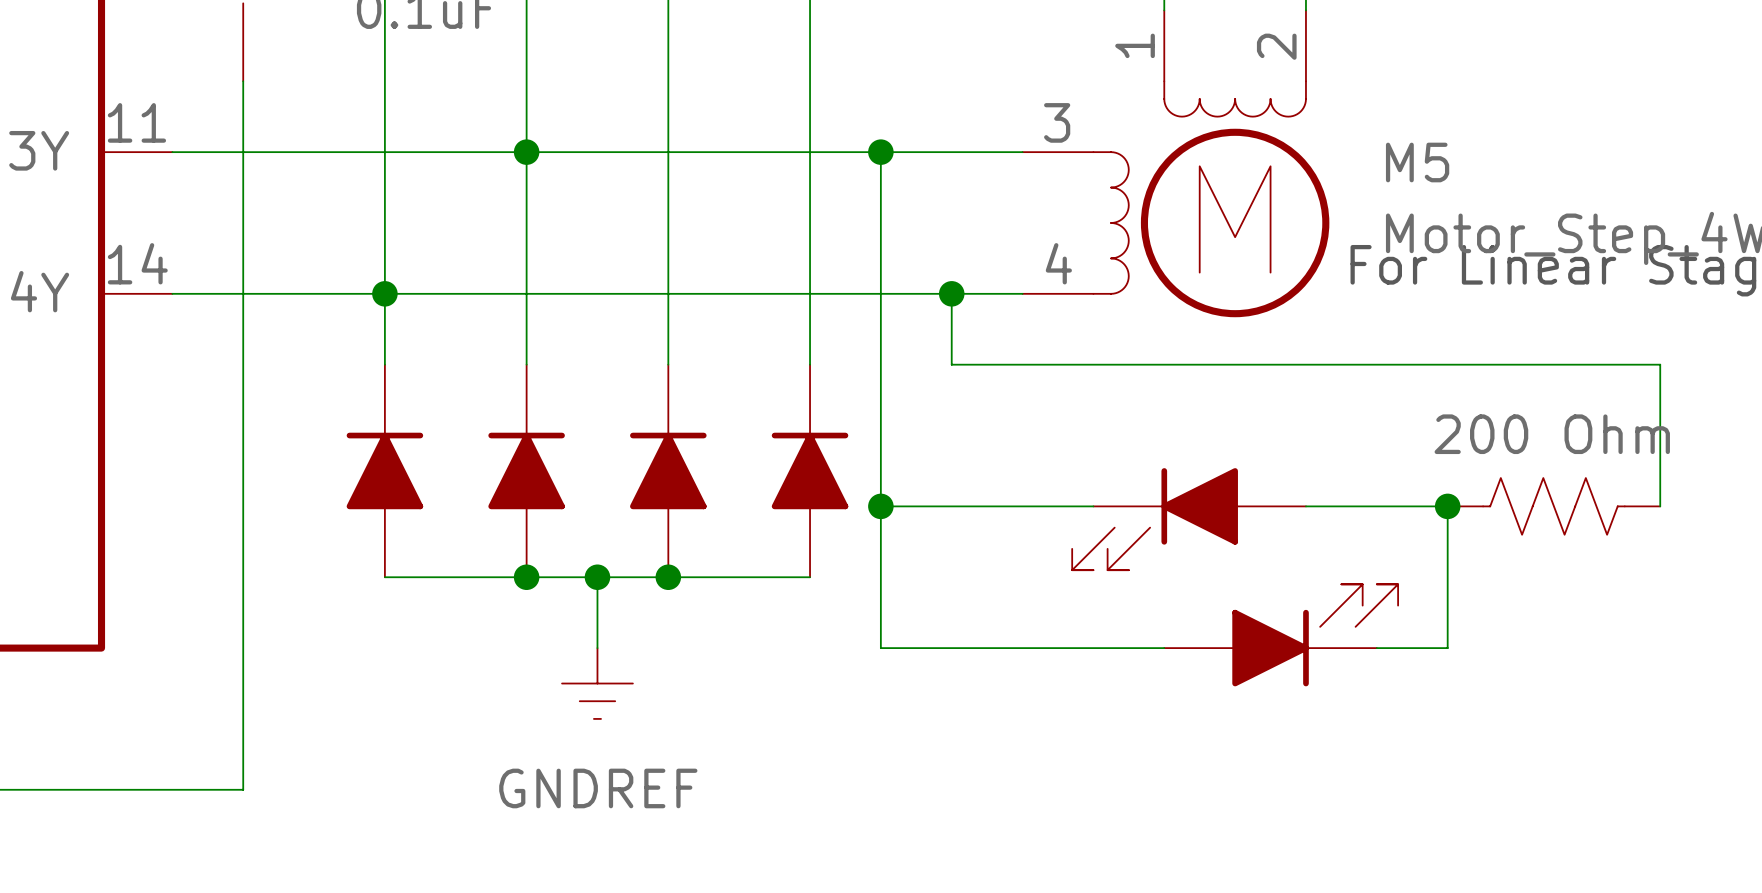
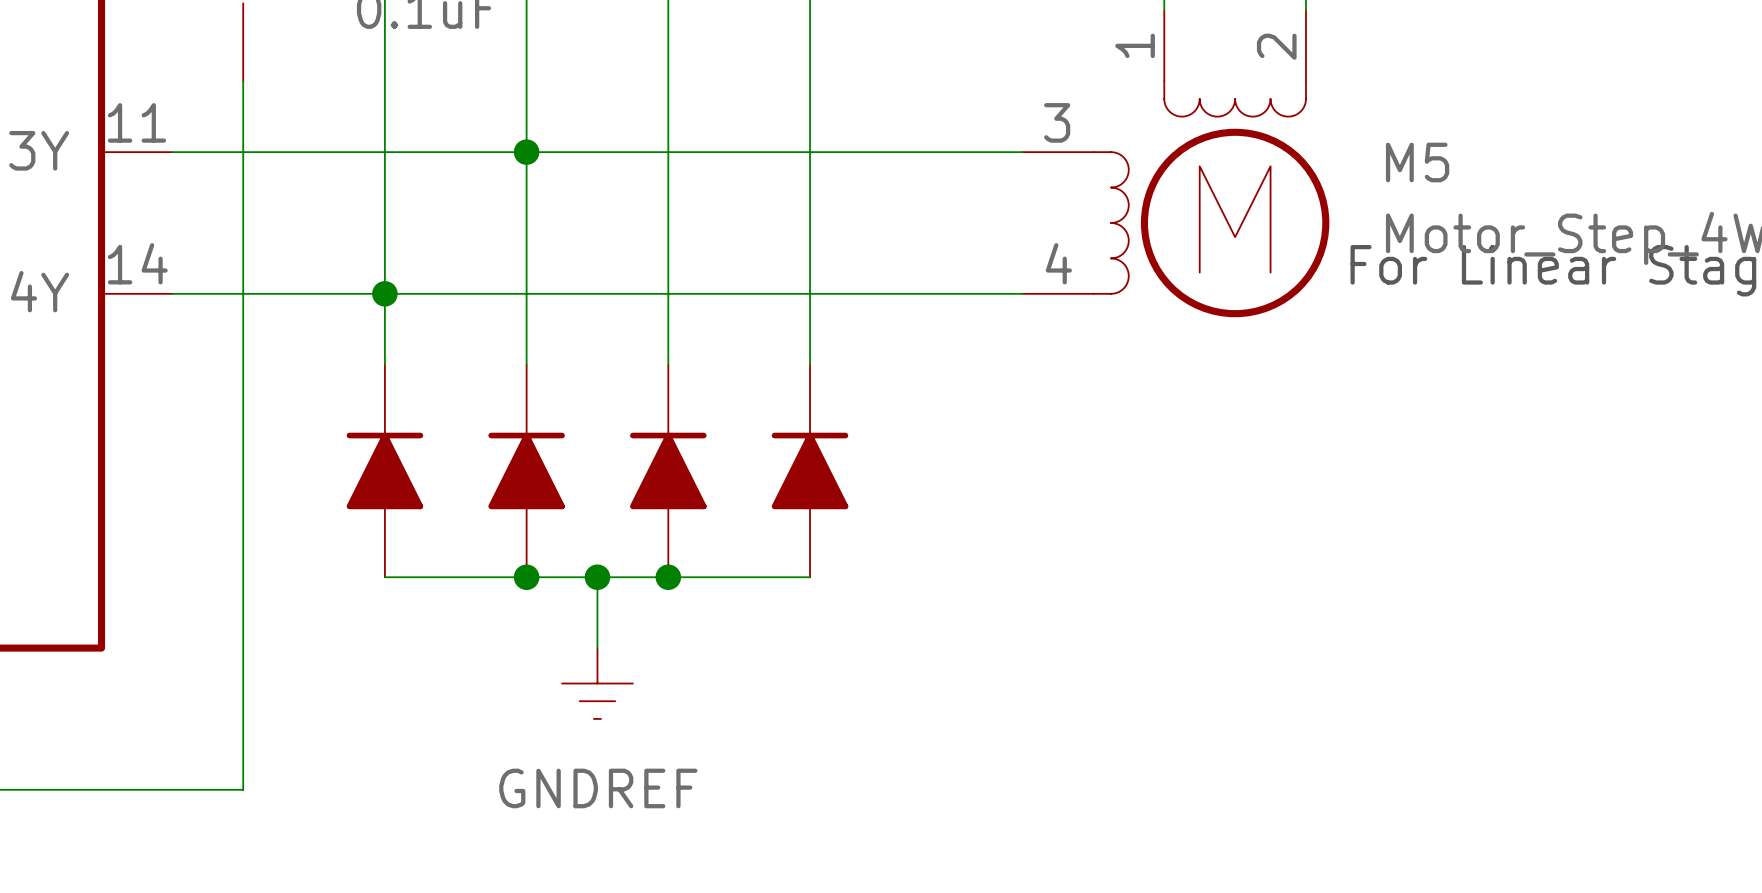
wire: (880, 152) (880, 648) (1164, 648) -> none
junction: (880, 152) -> none
wire: (951, 293) (951, 364) (1660, 364) (1660, 506) -> none
junction: (951, 293) -> none
wire: (880, 506) (1093, 506) -> none
junction: (880, 506) -> none
wire: (1305, 506) (1447, 506) (1447, 648) (1376, 648) -> none
junction: (1447, 506) -> none
part: 200 Ohm (1553, 506) -> none
part: (1189, 519) -> none
part: (1281, 635) -> none

